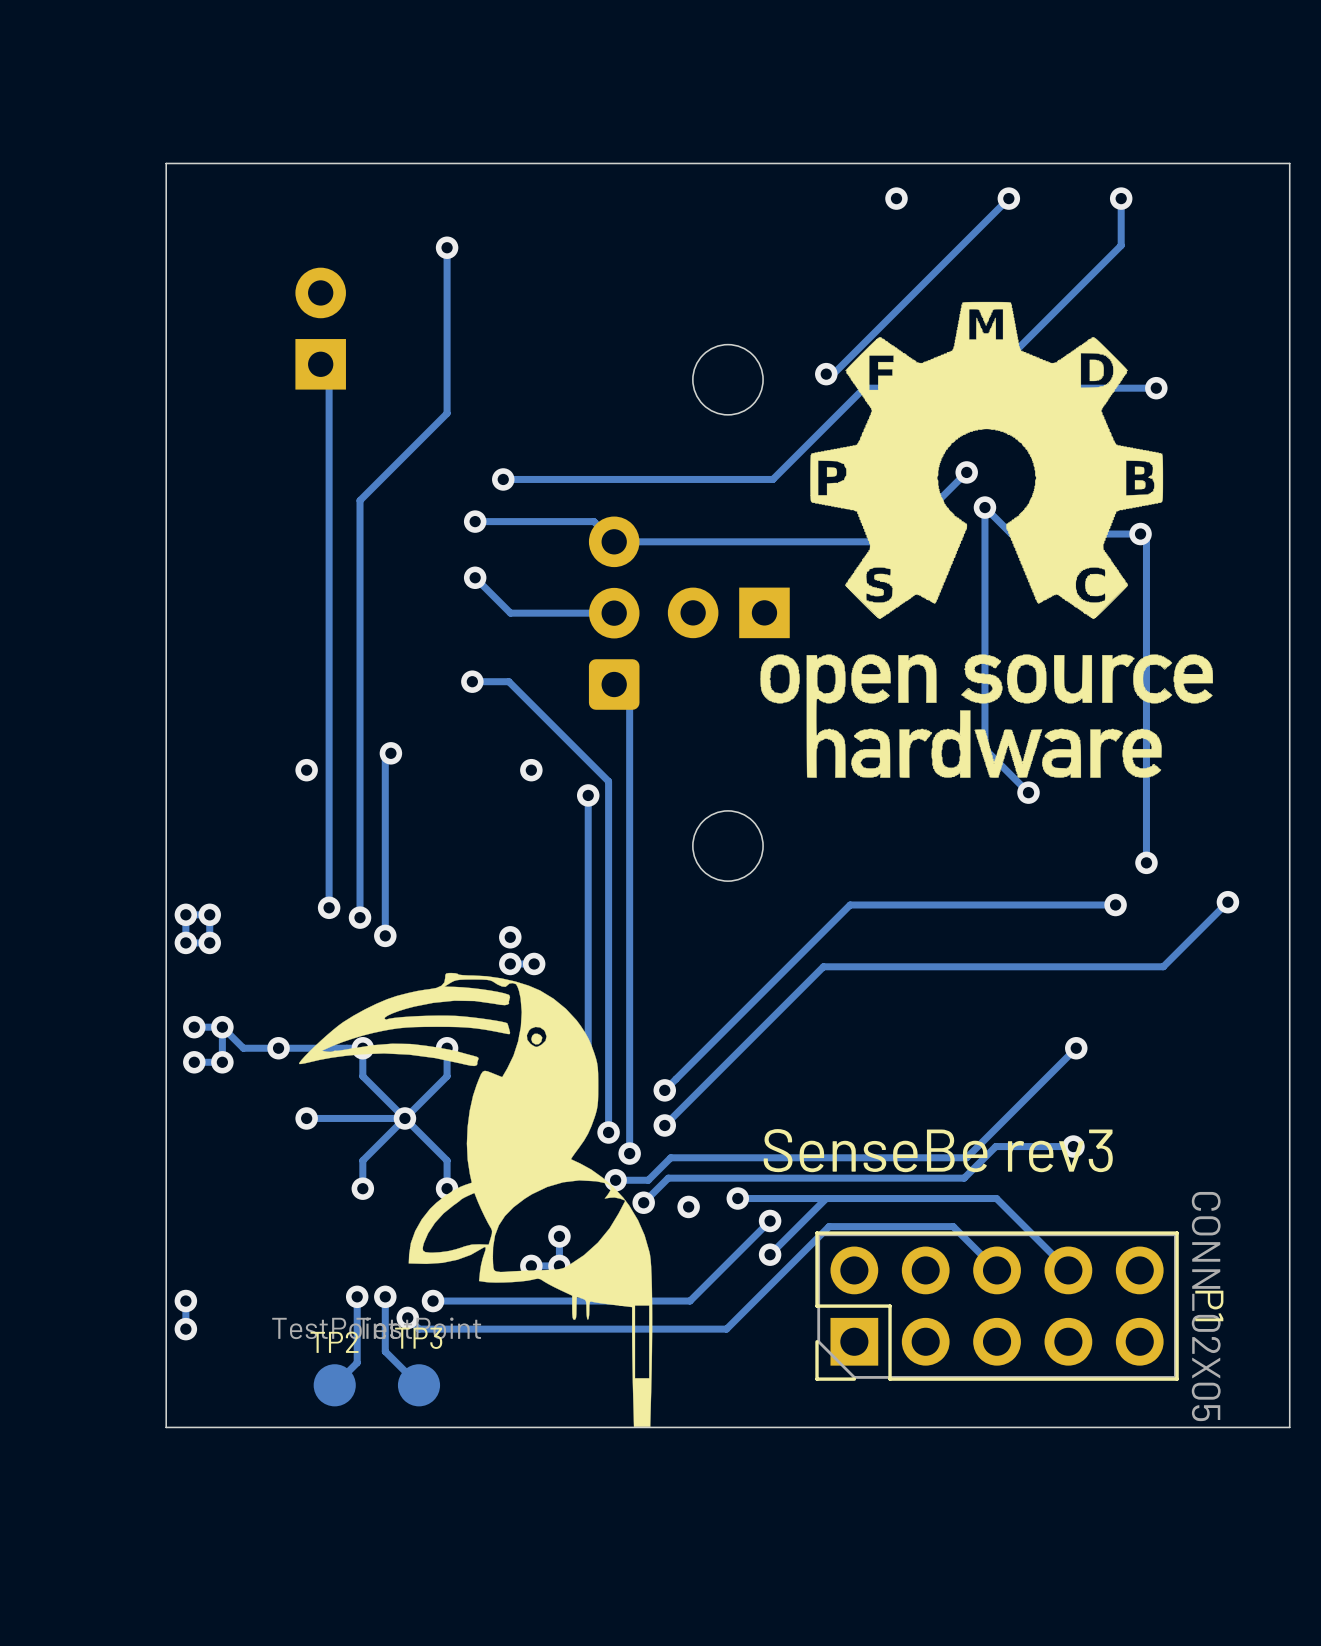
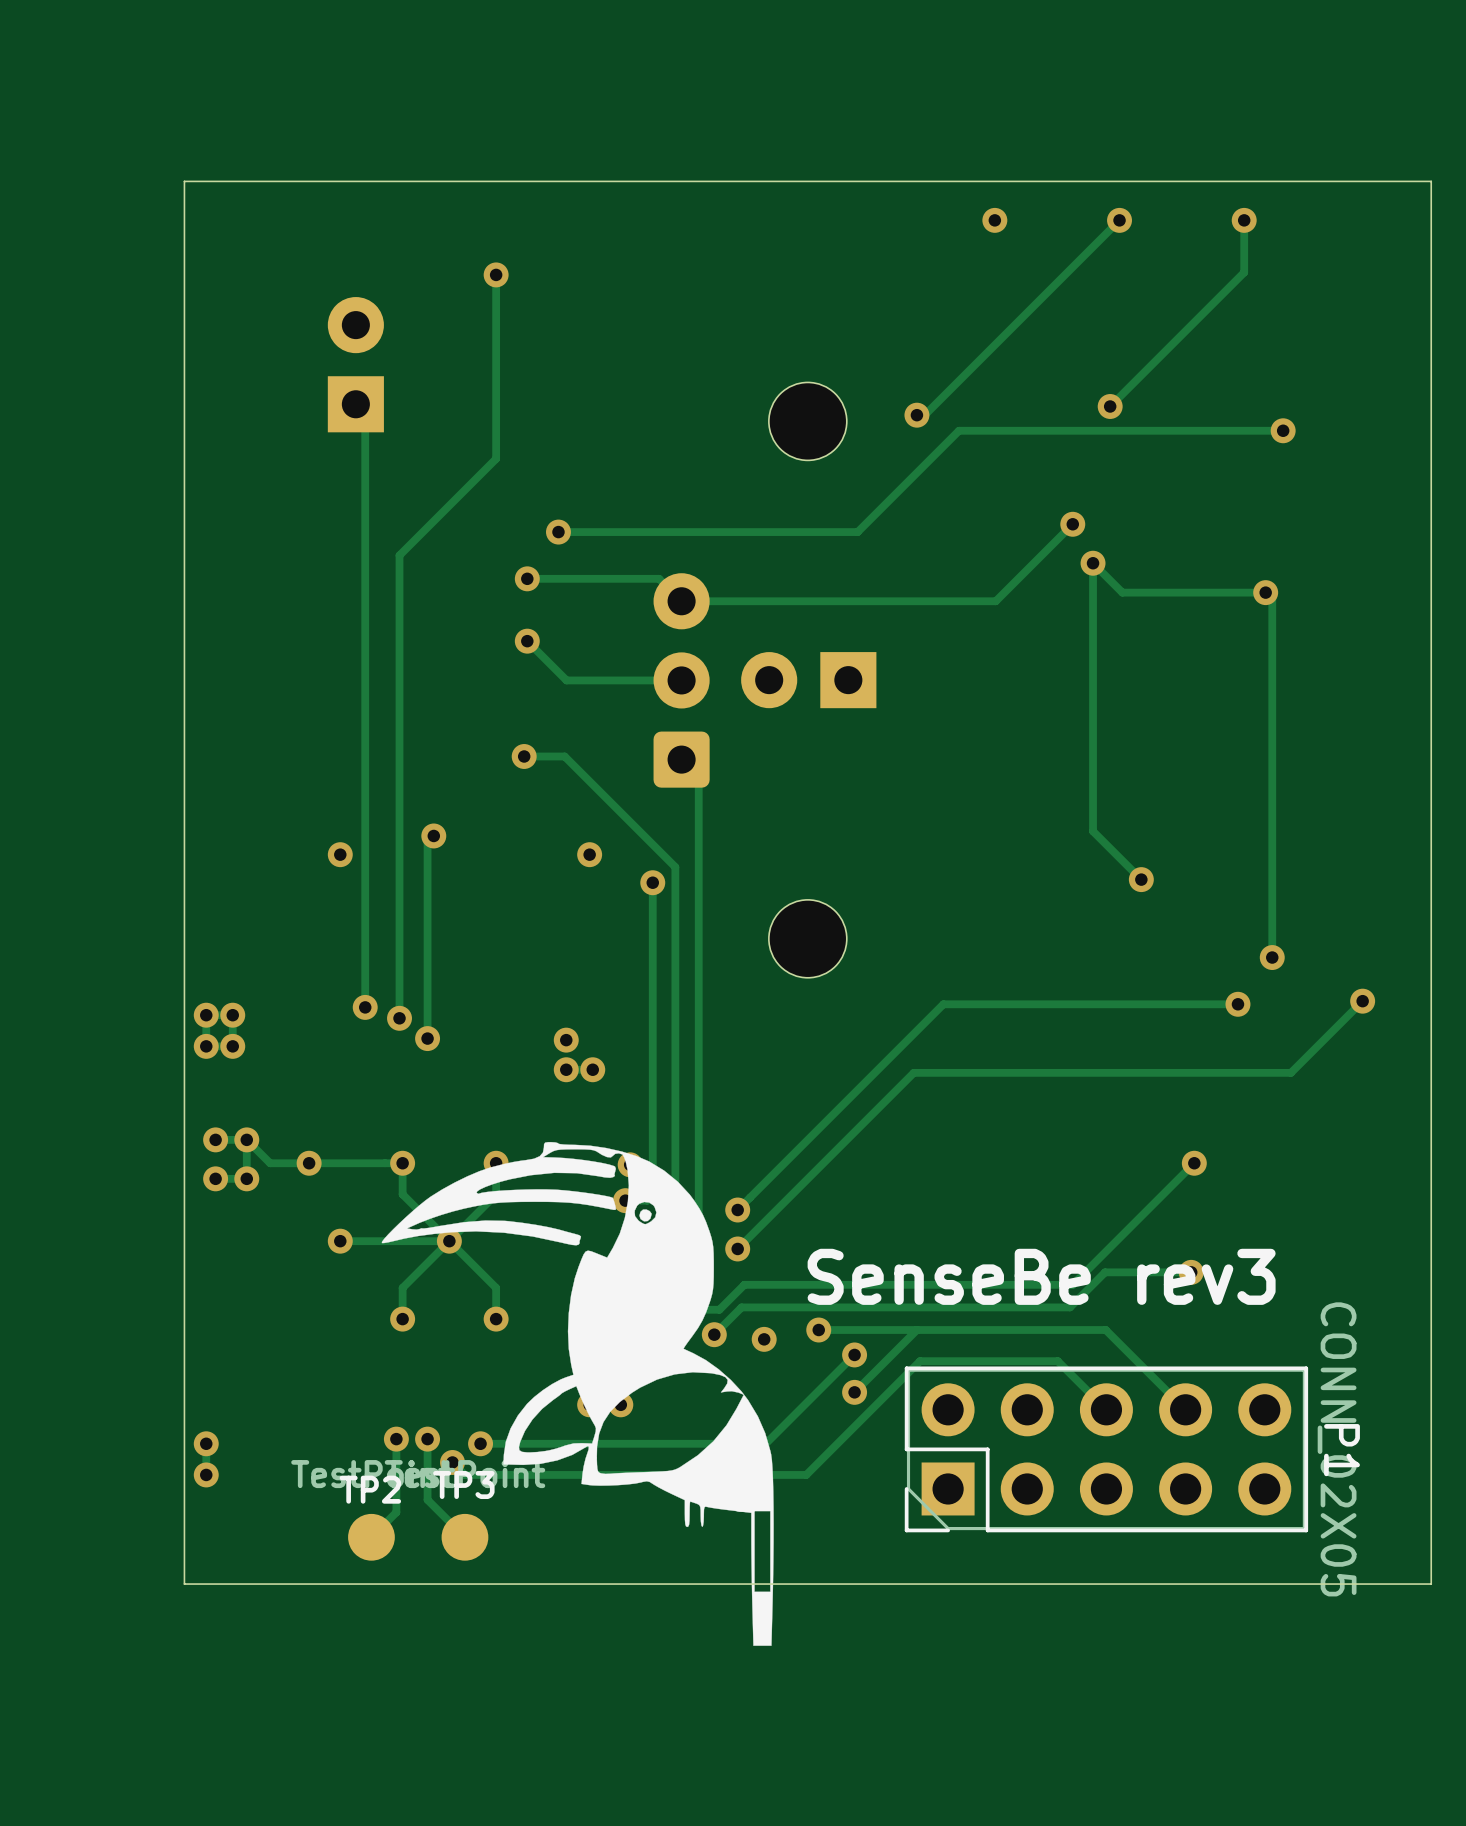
drawing: [760, 301, 1214, 778] -> none
drawing position: (475, 1199) -> (577, 1393)

